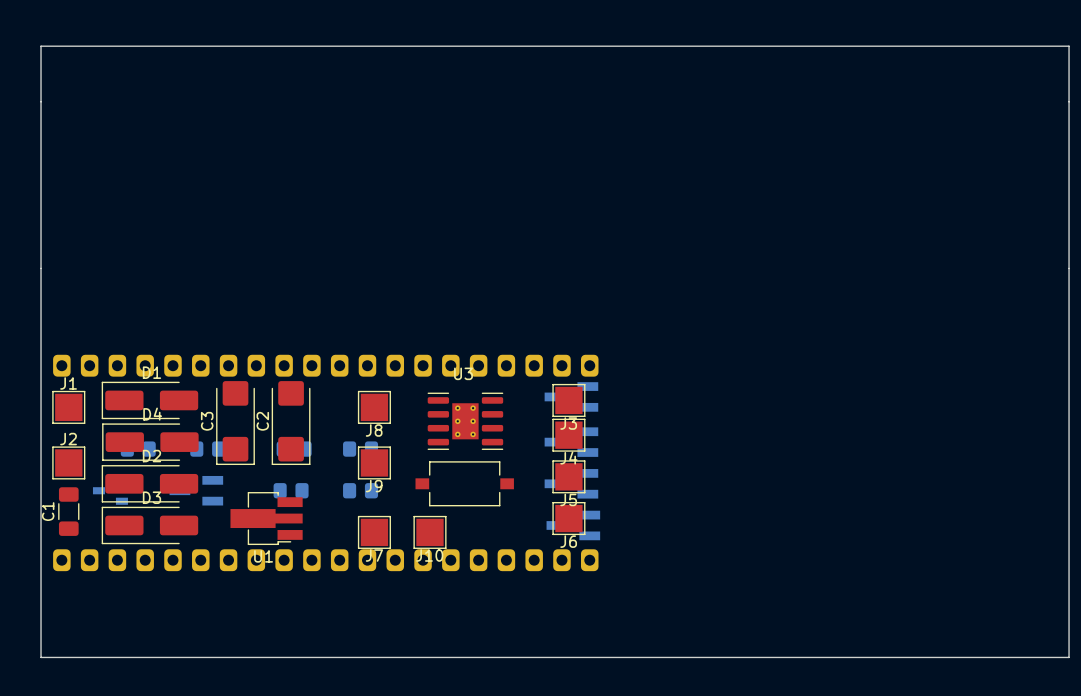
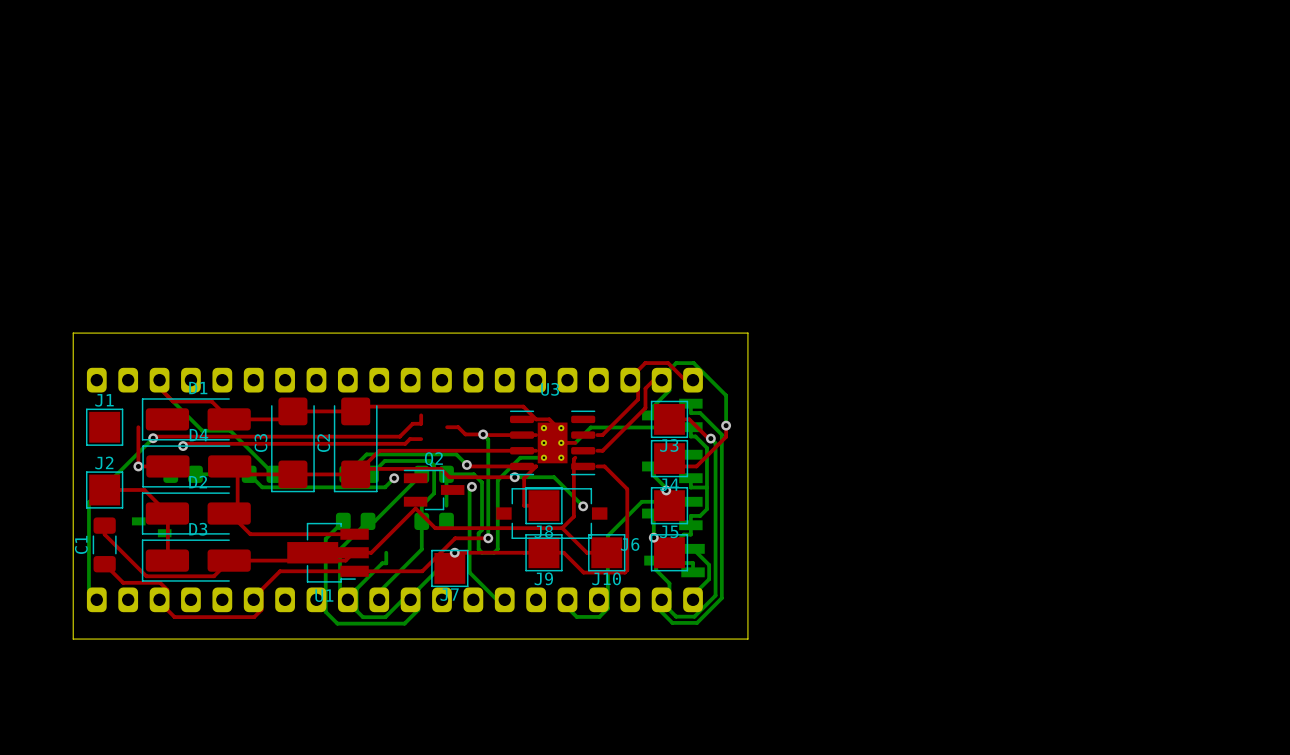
board edge: (41, 324) (41, 46) (1069, 46) (1069, 657) (41, 657) (41, 594) -> (73, 333) (747, 333) (747, 639) (73, 639)
top track: none -> (151, 380) (173, 401) (211, 401) (229, 419) (284, 419) (292, 411) (355, 411) (360, 406) (523, 406) (536, 419) (549, 419) (558, 428)
bottom track: none -> (151, 380) (202, 430) (230, 430) (273, 474)
top track: none -> (653, 380) (645, 388) (645, 407) (602, 450) (597, 450)
top track: none -> (685, 380) (668, 363) (645, 363) (638, 370) (638, 399) (602, 435) (597, 435)
bottom track: none -> (690, 403) (690, 413) (700, 413) (721, 434) (721, 598) (697, 622) (672, 622) (653, 604) (653, 599)
top track: none -> (421, 415) (421, 423) (412, 423) (399, 436) (154, 436) (153, 438)
bottom track: none -> (653, 415) (653, 406) (669, 390) (669, 369) (676, 363) (693, 363) (726, 395) (726, 425)
top track: none -> (669, 419) (689, 419) (708, 438) (710, 438)
top track: none -> (726, 425) (726, 436) (696, 466) (669, 466)
via: none -> (726, 425)
top track: none -> (138, 427) (138, 466) (167, 466)
top track: none -> (447, 427) (458, 427) (465, 434) (536, 435)
J8 position: (374, 407) -> (543, 505)
bottom track: none -> (690, 427) (690, 436) (695, 436) (706, 447) (706, 509) (700, 515) (690, 515) (690, 534) (683, 534) (676, 541) (676, 556) (683, 563) (693, 563) (693, 572)
bottom track: none -> (690, 427) (590, 427) (575, 442)
bottom track: none -> (558, 428) (558, 457) (520, 457) (497, 480) (497, 549) (494, 552) (482, 552) (478, 549) (478, 533) (481, 529) (481, 482) (473, 474) (446, 474) (446, 505)
bottom track: none -> (483, 434) (488, 439) (488, 538)
via: none -> (483, 434)
bottom track: none -> (153, 438) (88, 502) (88, 599)
via: none -> (153, 438)
top track: none -> (421, 439) (409, 439) (405, 443) (185, 443) (183, 446)
bottom track: none -> (710, 438) (715, 443) (715, 595) (694, 616) (676, 616) (669, 609) (669, 583) (655, 569) (655, 560)
via: none -> (710, 438)
top track: none -> (558, 442) (575, 442)
via: none -> (183, 446)
top track: none -> (536, 450) (379, 450) (355, 474) (237, 474)
top track: none -> (575, 457) (573, 516) (562, 528)
top track: none -> (466, 464) (536, 466) (524, 478) (524, 505) (543, 505)
bottom track: none -> (466, 464) (456, 454) (366, 454) (346, 474)
via: none -> (466, 464)
via: none -> (138, 466)
top track: none -> (597, 466) (604, 466) (627, 489) (627, 570) (624, 572) (583, 572) (563, 552) (454, 552)
bottom track: none -> (653, 466) (653, 475) (666, 490)
top track: none -> (361, 468) (441, 468) (449, 477) (514, 477)
bottom track: none -> (195, 474) (249, 474) (262, 487) (385, 487) (394, 478)
top track: none -> (237, 474) (237, 505) (229, 513) (250, 534) (354, 534)
bottom track: none -> (371, 474) (384, 460) (429, 460) (434, 465) (434, 493) (421, 505) (421, 549) (371, 599)
bottom track: none -> (421, 474) (374, 521) (368, 521) (340, 549) (340, 599)
bottom track: none -> (514, 477) (554, 477) (583, 506)
via: none -> (514, 477)
via: none -> (394, 478)
bottom track: none -> (690, 478) (690, 487) (706, 487)
bottom track: none -> (471, 486) (469, 489) (469, 572) (496, 599)
via: none -> (471, 486)
top track: none -> (104, 489) (144, 489) (167, 513) (167, 560)
J9 position: (374, 462) -> (543, 552)
via: none -> (666, 490)
bottom track: none -> (690, 501) (641, 501) (607, 535) (607, 608) (599, 616) (576, 616) (559, 599)
via: none -> (583, 506)
bottom track: none -> (653, 513) (653, 537)
Q2 side: bottom (196, 490) -> top (434, 489)
bottom track: none -> (343, 521) (325, 538) (325, 611) (337, 623) (404, 623) (418, 609) (418, 589) (454, 552)
top track: none -> (104, 525) (104, 534) (146, 576) (213, 576) (229, 560) (345, 560) (353, 552) (371, 552) (415, 508) (435, 528) (562, 528)
top track: none -> (562, 528) (586, 552) (606, 552)
top track: none -> (488, 538) (455, 538) (422, 571) (280, 571) (261, 589) (261, 609) (254, 617) (174, 617) (167, 609) (167, 590) (160, 582) (123, 582) (104, 564)
via: none -> (488, 538)
via: none -> (653, 537)
bottom track: none -> (693, 548) (709, 564) (709, 579) (688, 599) (685, 599)
bottom track: none -> (386, 552) (386, 563) (382, 563) (356, 588) (356, 610) (363, 617) (385, 617) (402, 599)
via: none -> (454, 552)
J10 position: (429, 532) -> (606, 552)
J6 name position: J6 (568, 541) -> J6 (630, 544)

